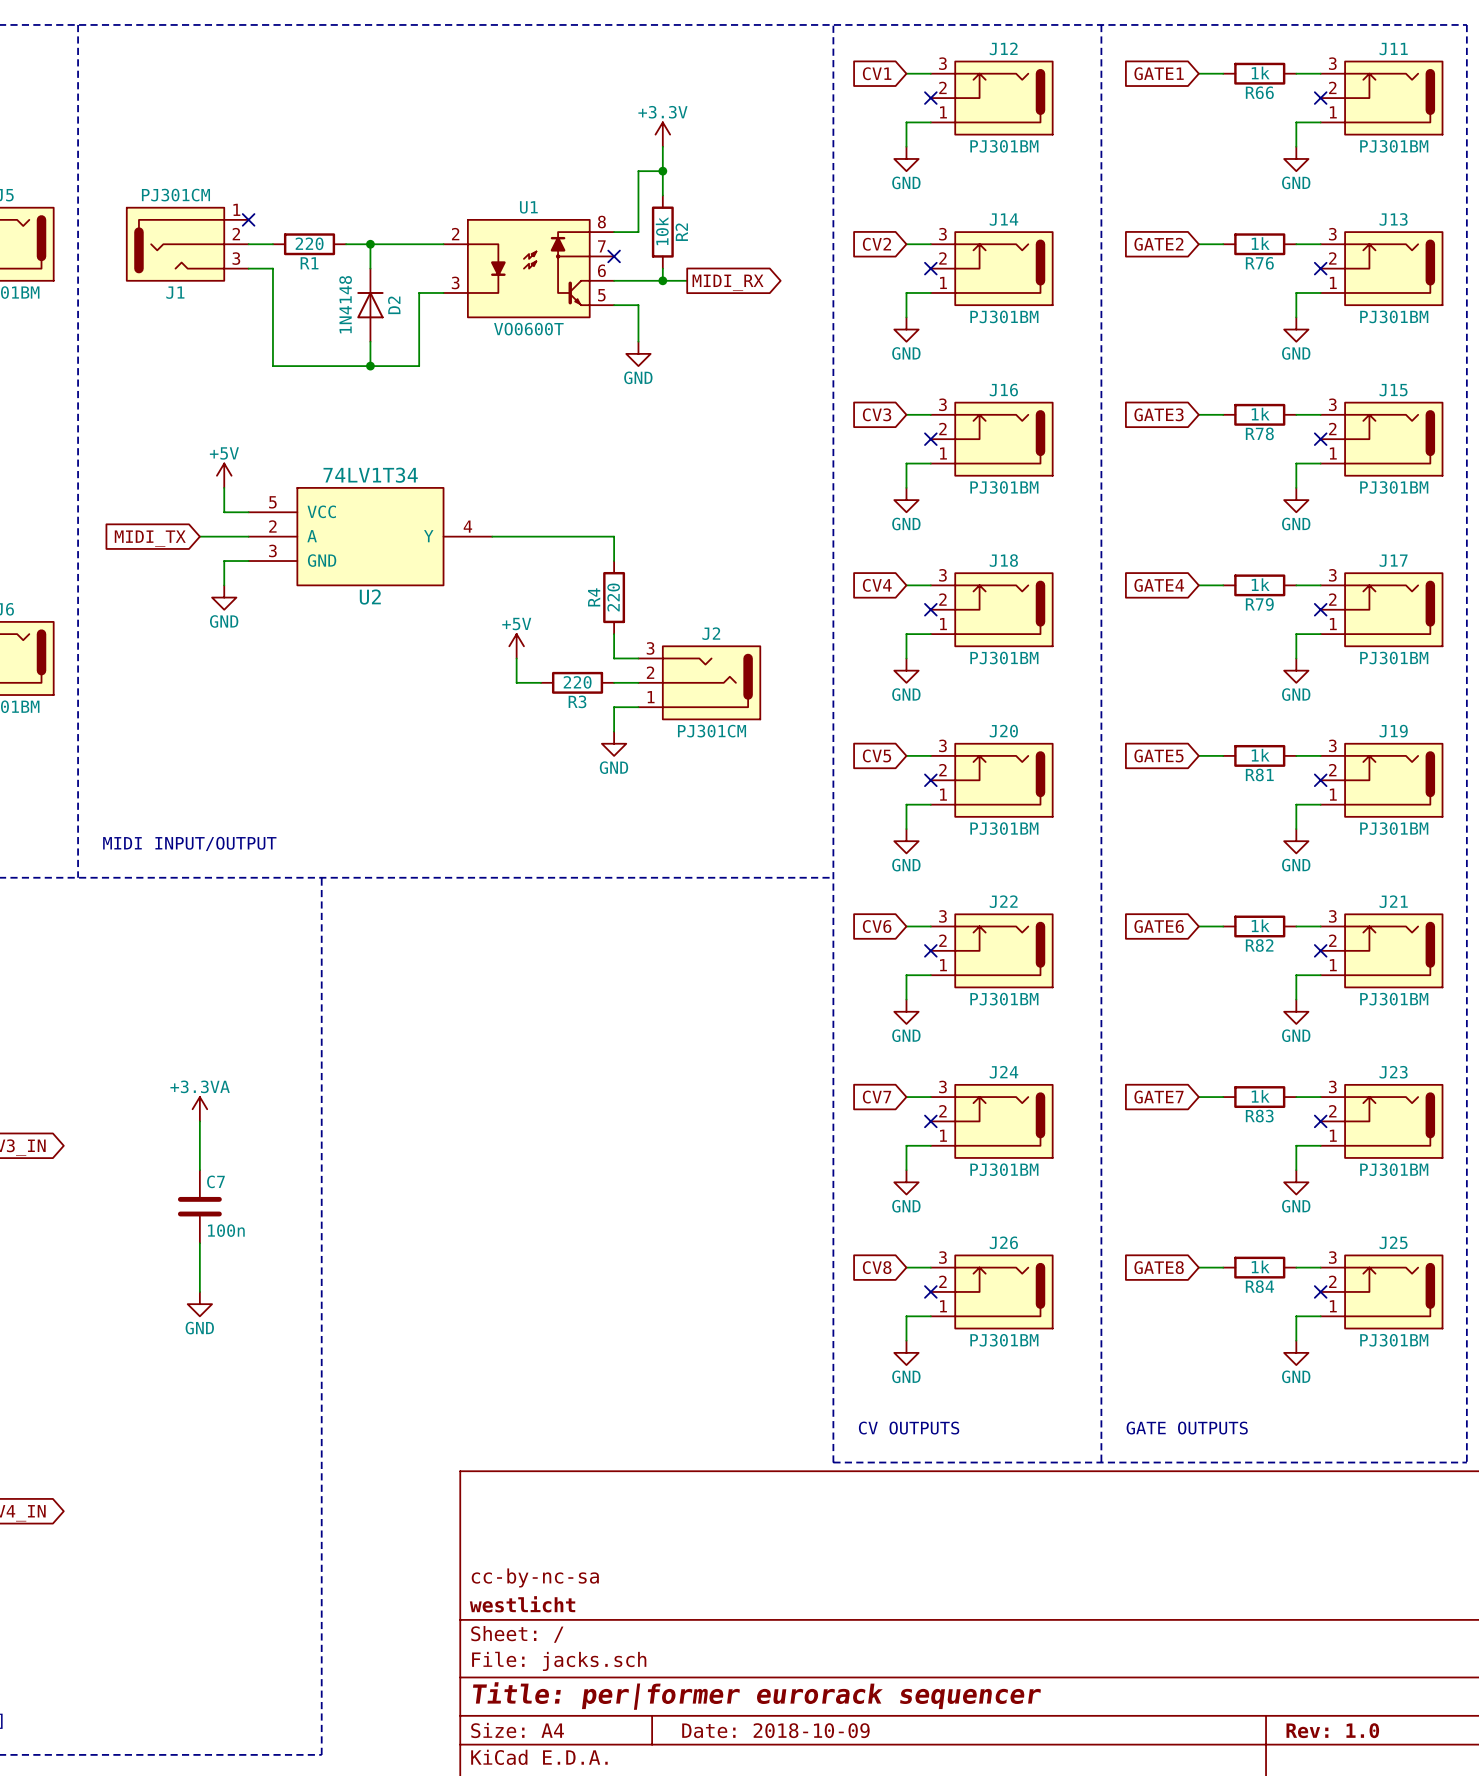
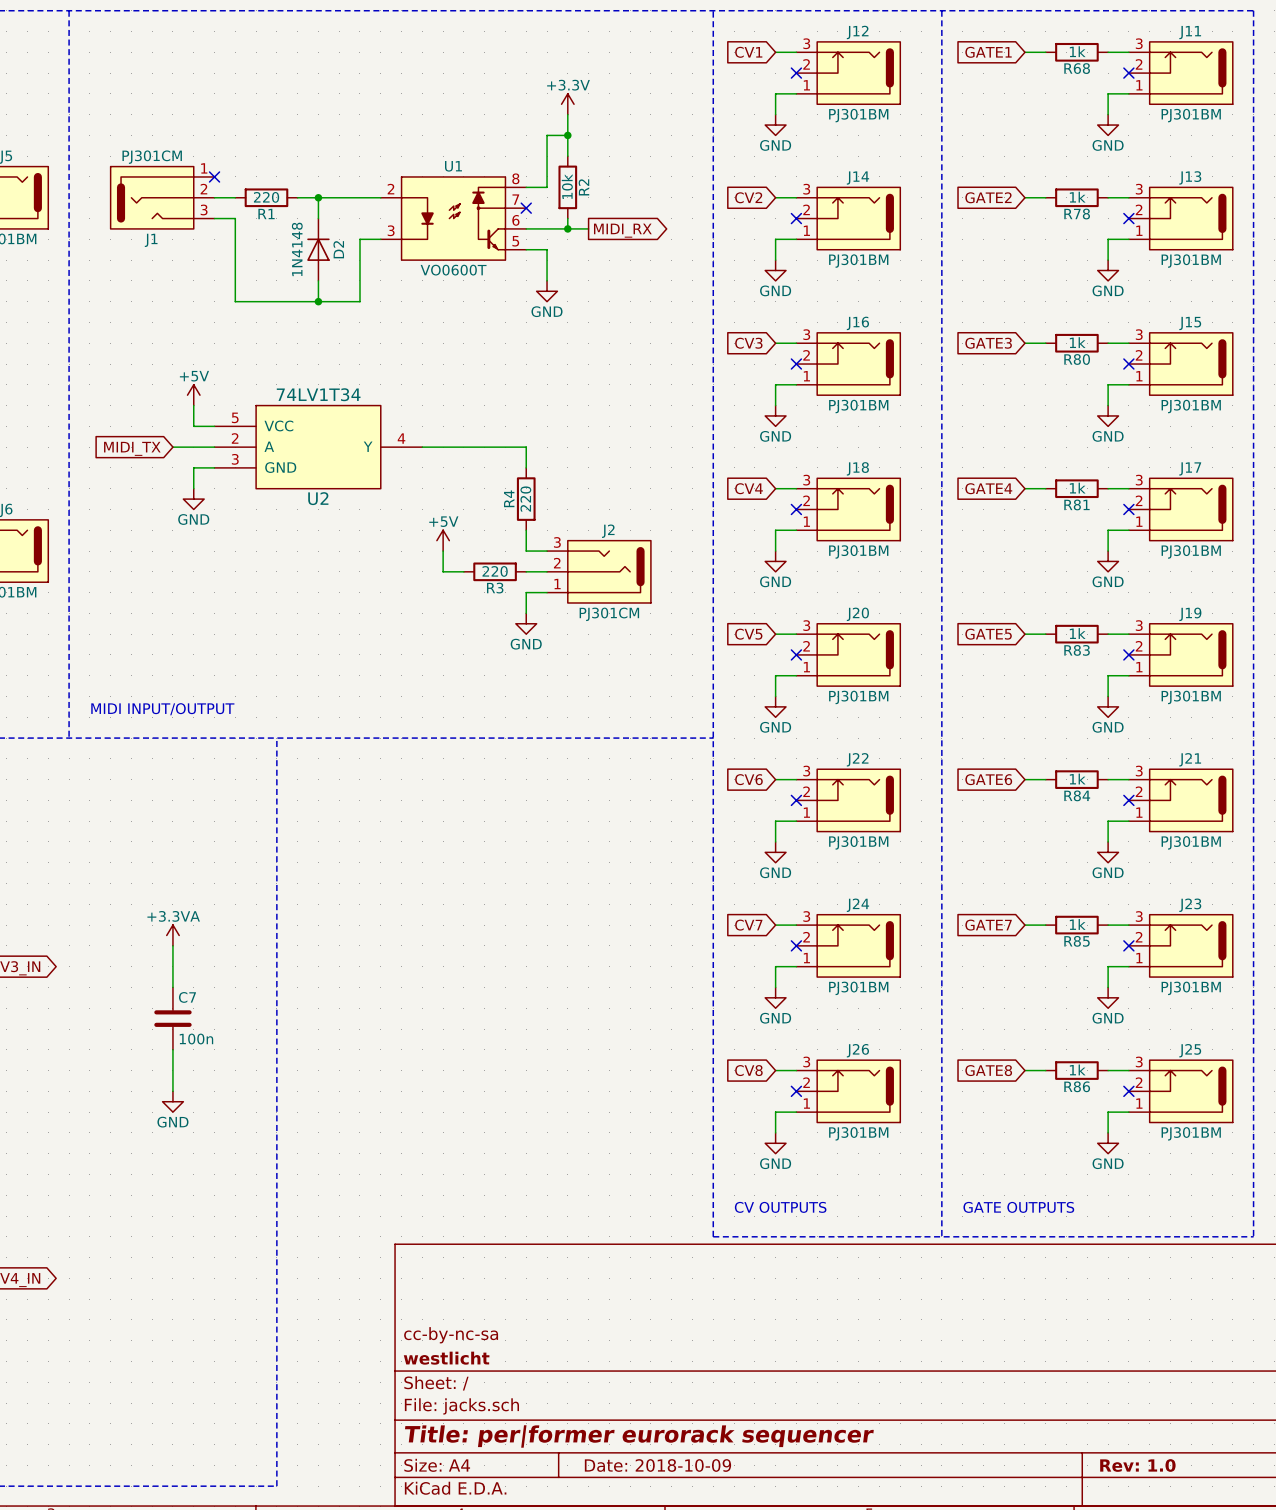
R66 name: R66 (1259, 92) -> R68 (1077, 68)
R76 name: R76 (1259, 263) -> R78 (1077, 214)
R78 name: R78 (1259, 433) -> R80 (1077, 359)
R79 name: R79 (1259, 604) -> R81 (1076, 504)
R81 name: R81 (1259, 774) -> R83 (1077, 650)
R82 name: R82 (1259, 945) -> R84 (1077, 795)
R83 name: R83 (1259, 1116) -> R85 (1077, 941)
R84 name: R84 (1259, 1286) -> R86 (1077, 1086)

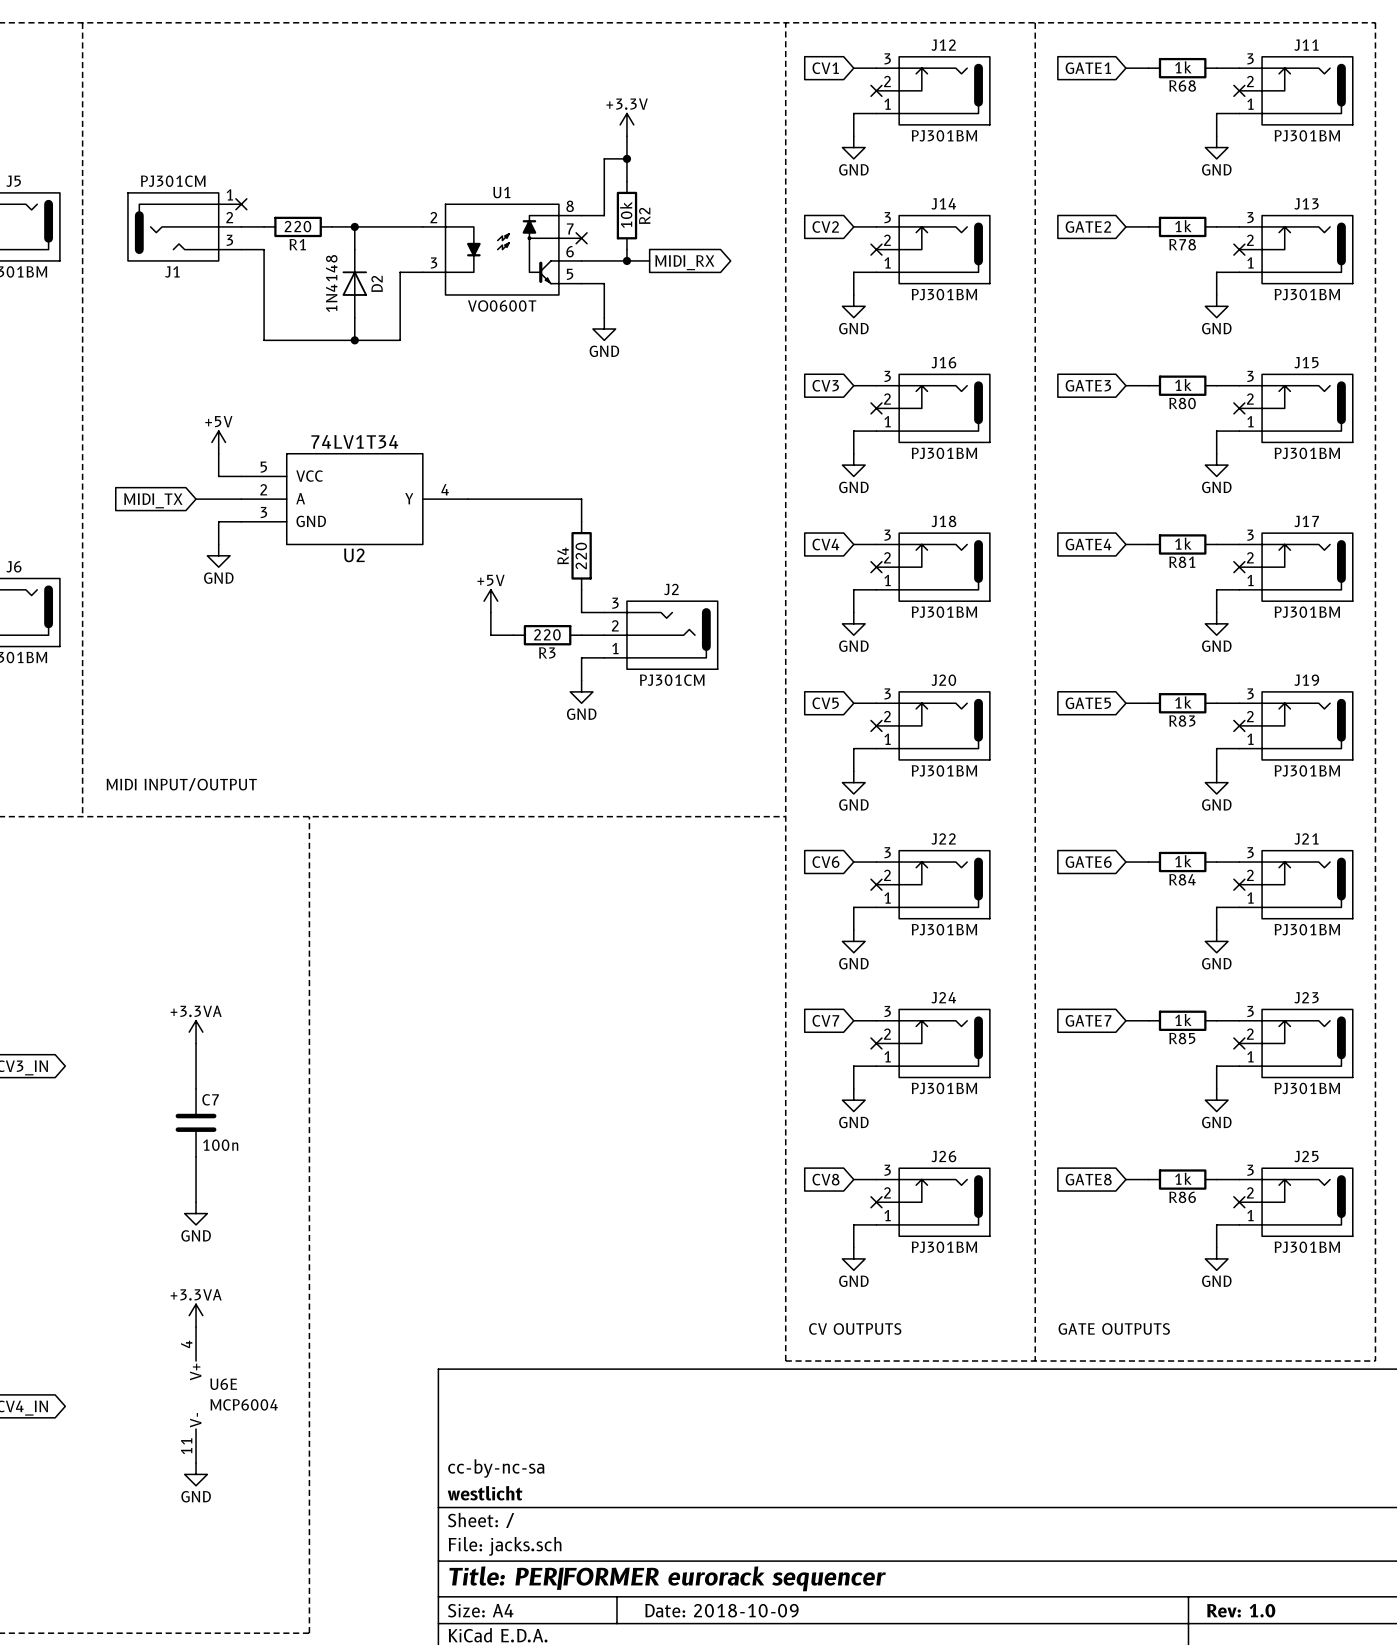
power symbol: none -> +3.3VA (196, 1315)
U6E: none -> MCP6004 (196, 1395)
power symbol: none -> GND (196, 1474)
title block: Title: per|former eurorack sequencer (639, 1436) -> Title: PER|FORMER eurorack sequencer (667, 1578)

